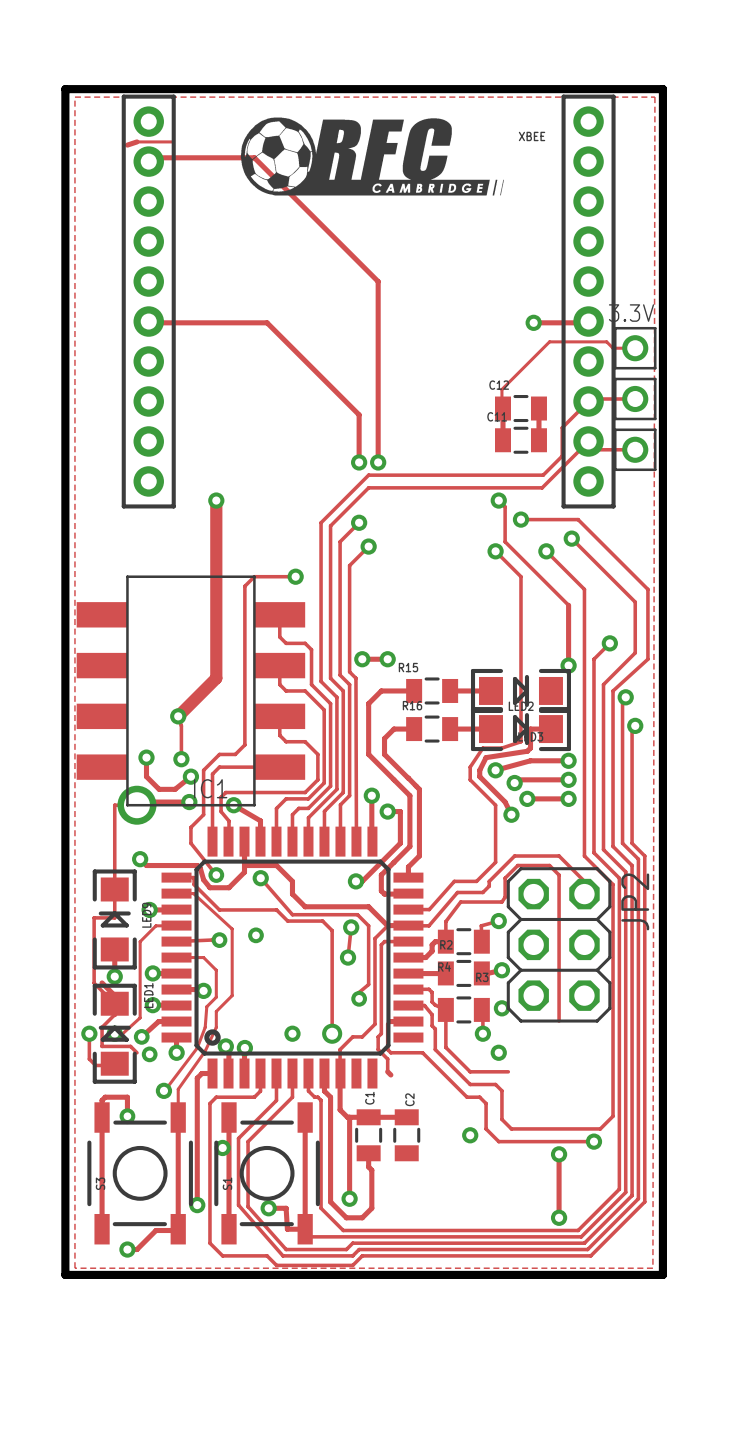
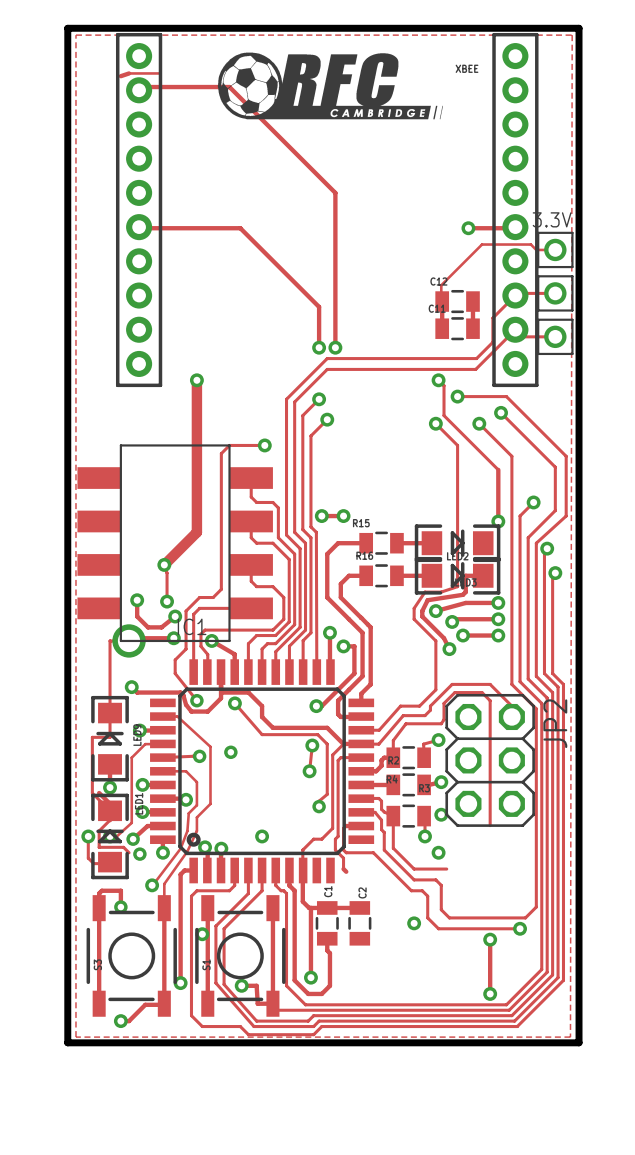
track: (176, 877) (193, 877) (194, 884) (219, 909) (276, 909) (287, 921) (322, 921) (332, 930) (332, 1033) -> none
via: (332, 1033) -> none

